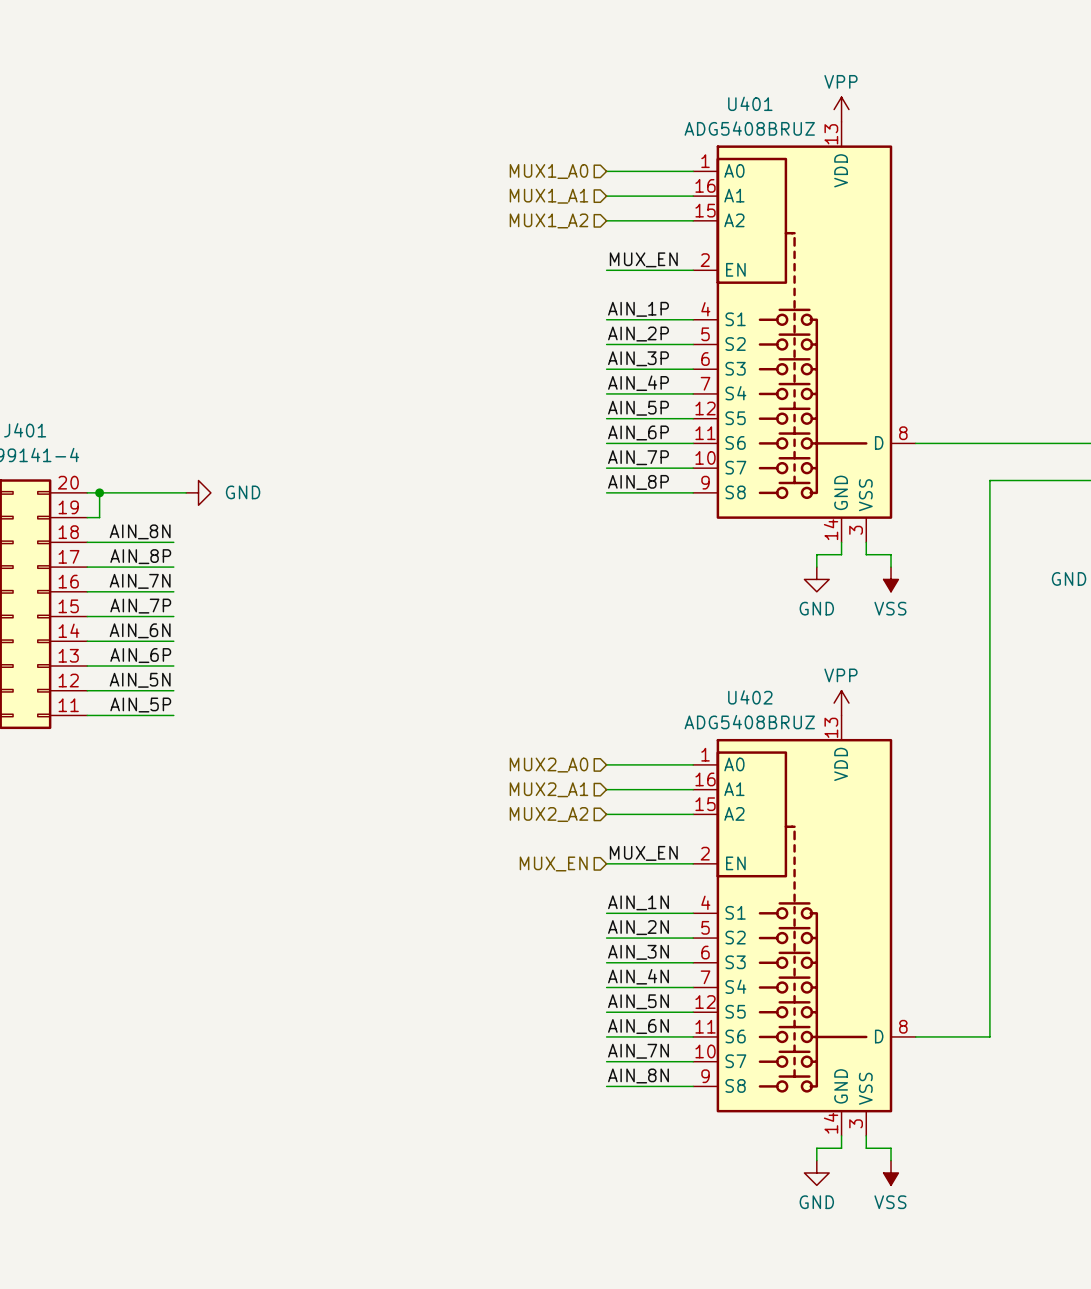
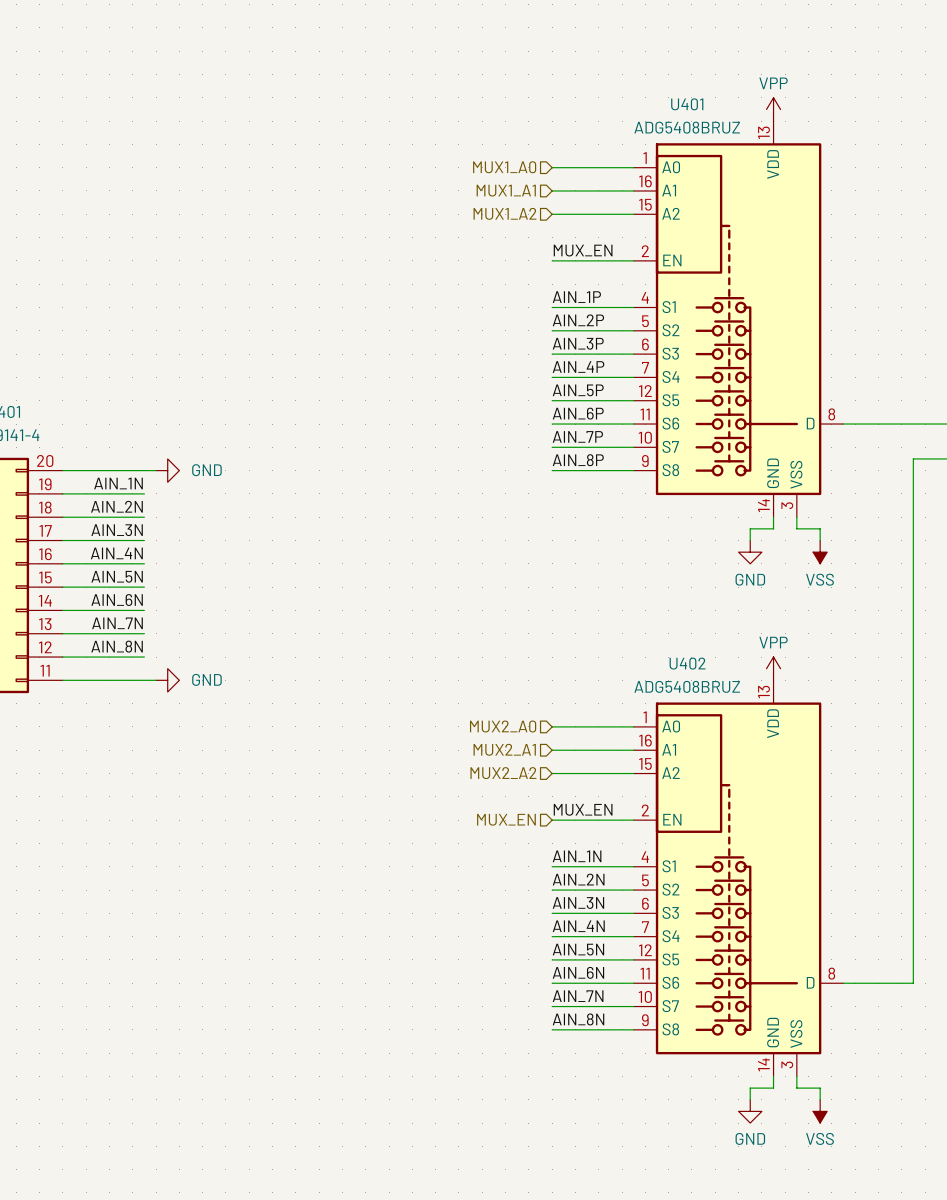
wire: (99, 492) (99, 517) -> (144, 493) (74, 493)
junction: (99, 492) -> none
label: none -> AIN_1N (118, 483)
label: AIN_8N (140, 531) -> AIN_2N (116, 506)
label: AIN_8P (140, 556) -> AIN_3N (117, 530)
label: AIN_7N (140, 581) -> AIN_4N (116, 553)
label: AIN_7P (140, 606) -> AIN_5N (117, 576)
label: AIN_6P (140, 655) -> AIN_7N (117, 623)
label: AIN_5N (140, 680) -> AIN_8N (117, 646)
label: AIN_5P (140, 705) -> none
wire: none -> (144, 680) (156, 680)
power symbol: none -> GND (167, 680)

